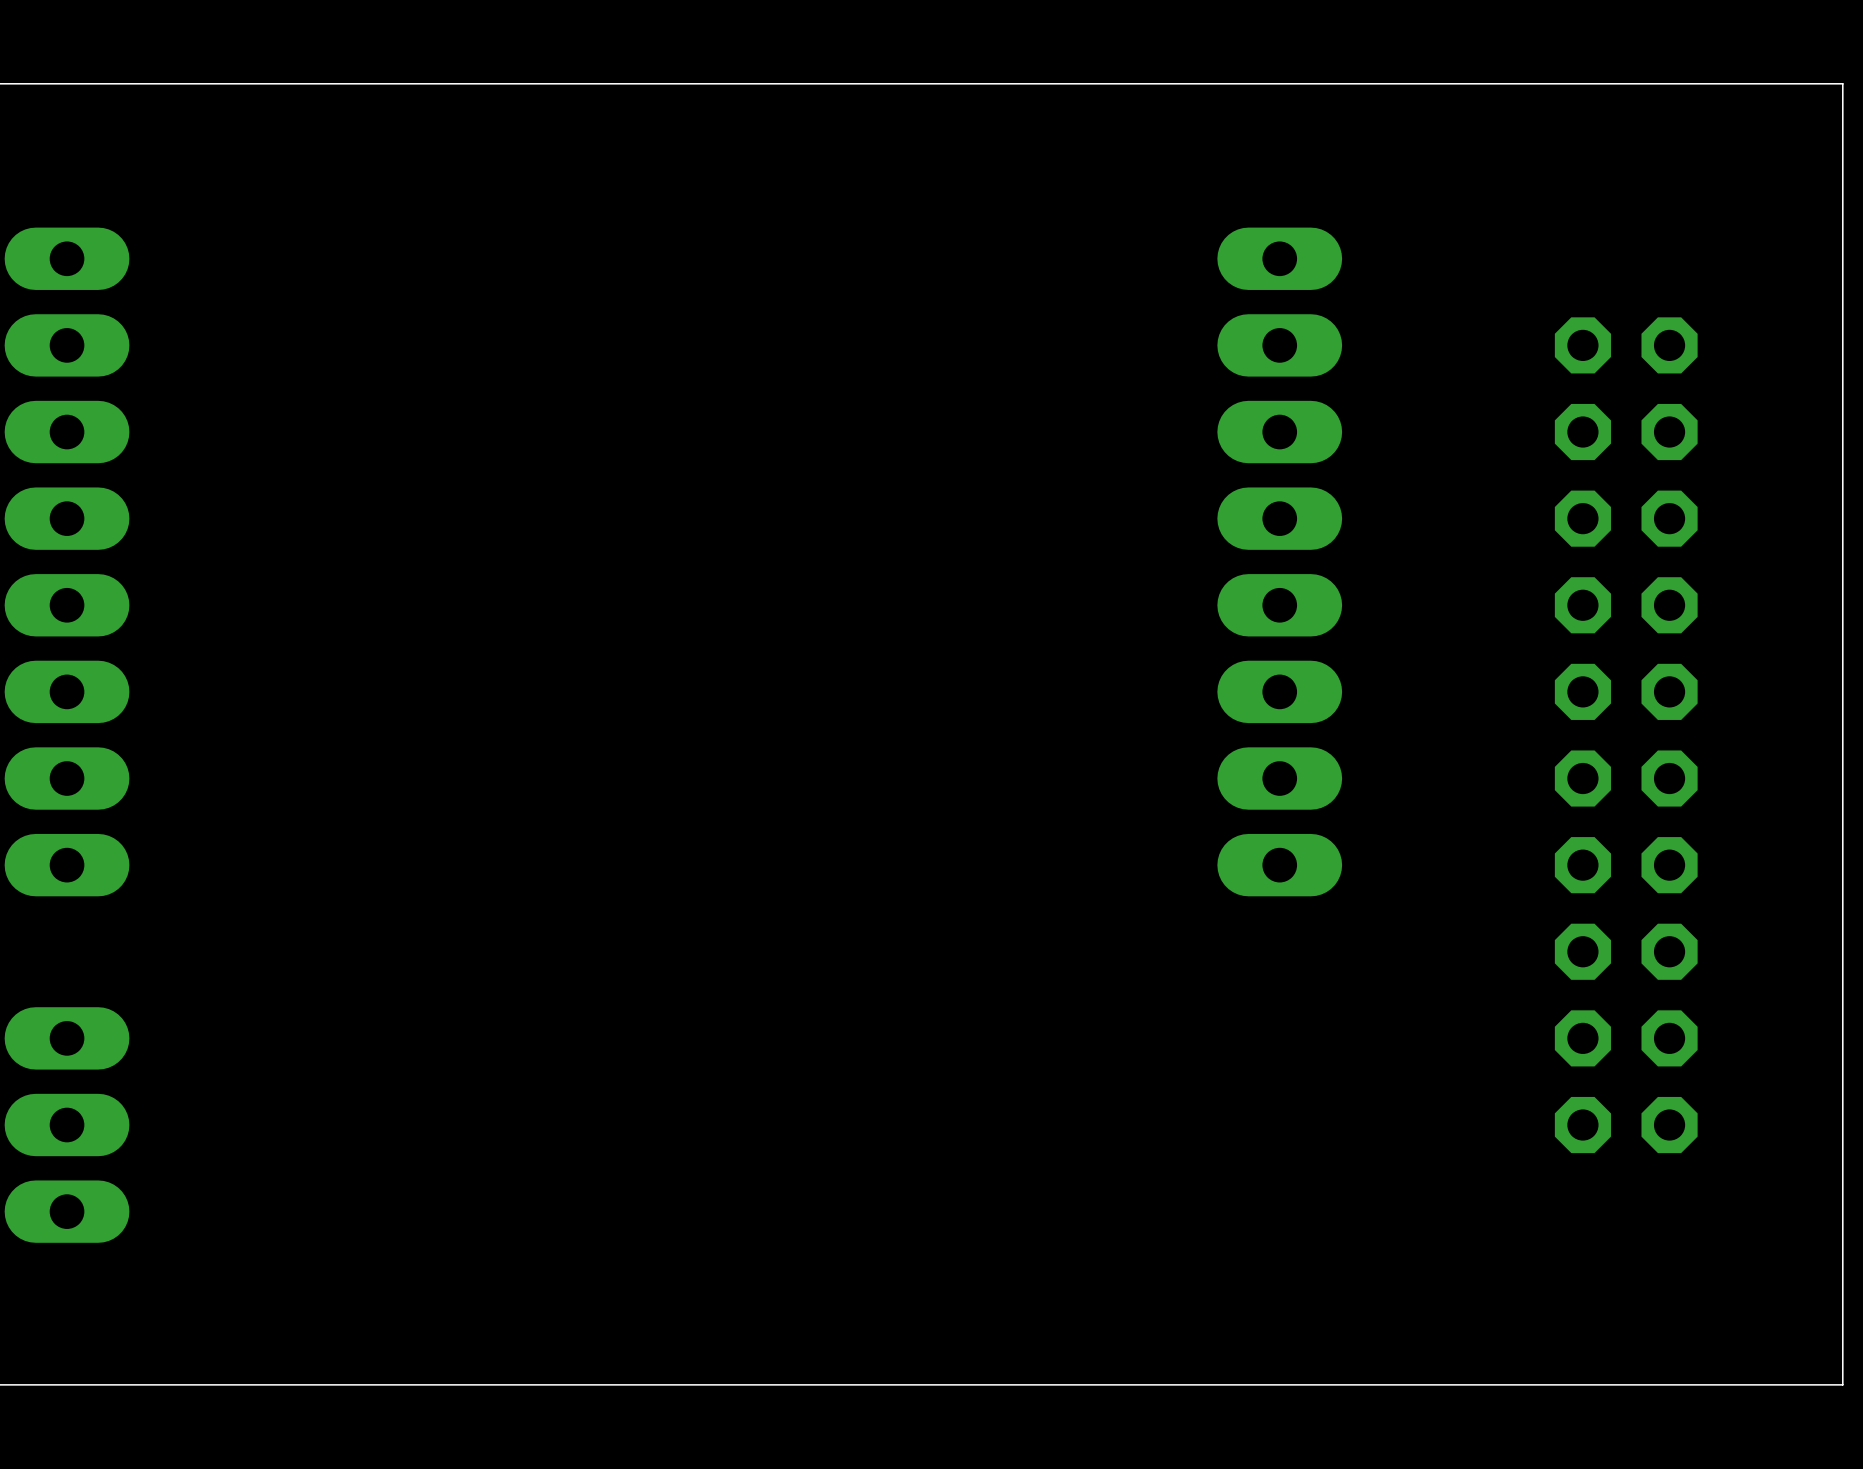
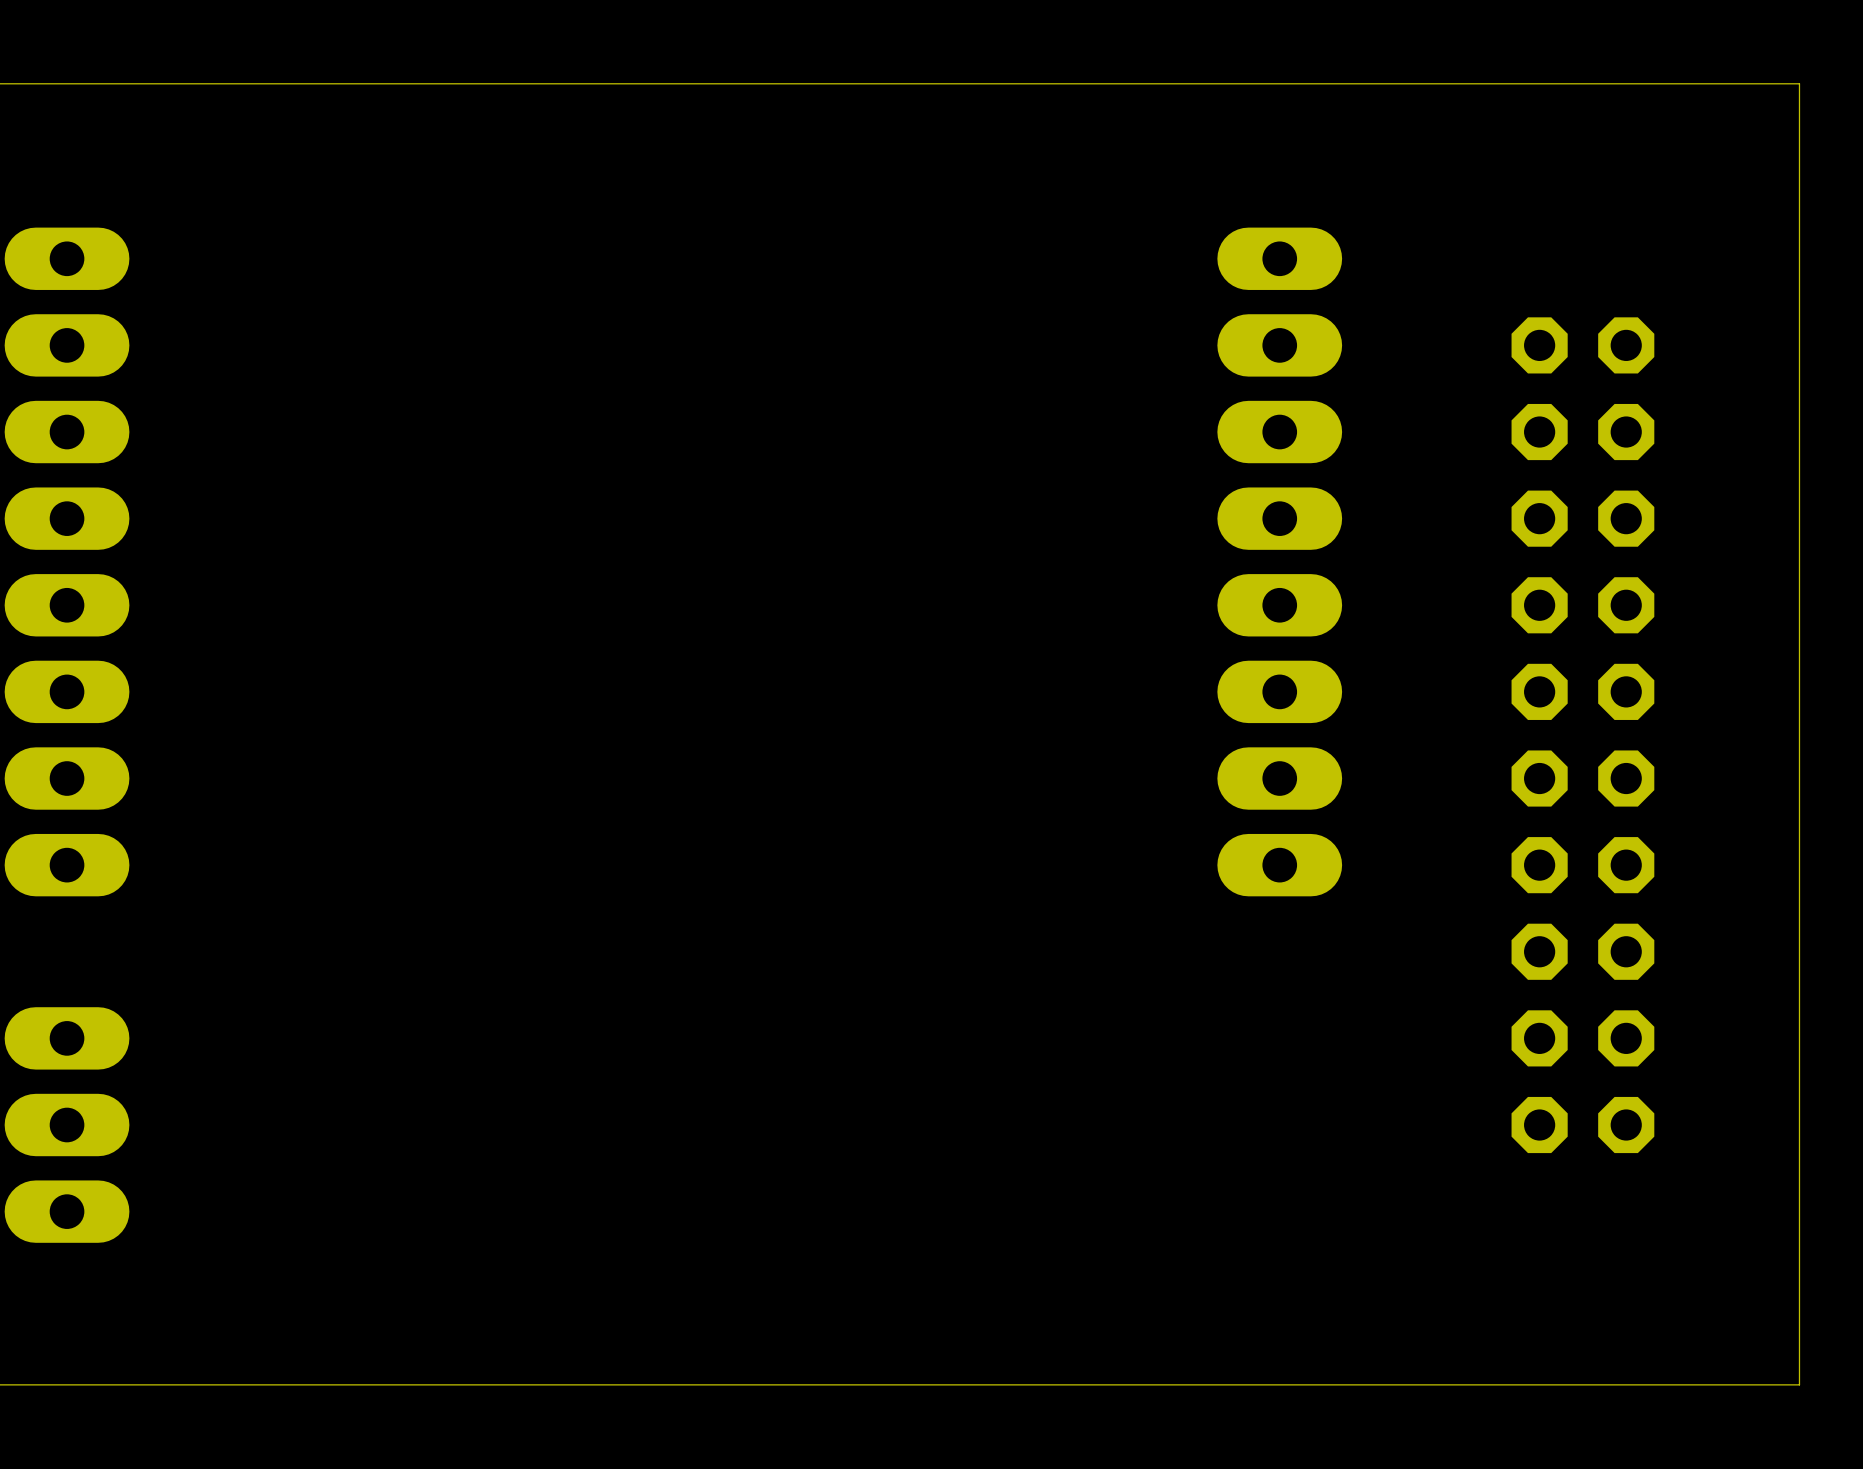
board edge: (1799, 83) (1842, 83) (1842, 1384) (1799, 1384) -> (1799, 83) (1799, 1384)
part position: (1626, 735) -> (1582, 735)

